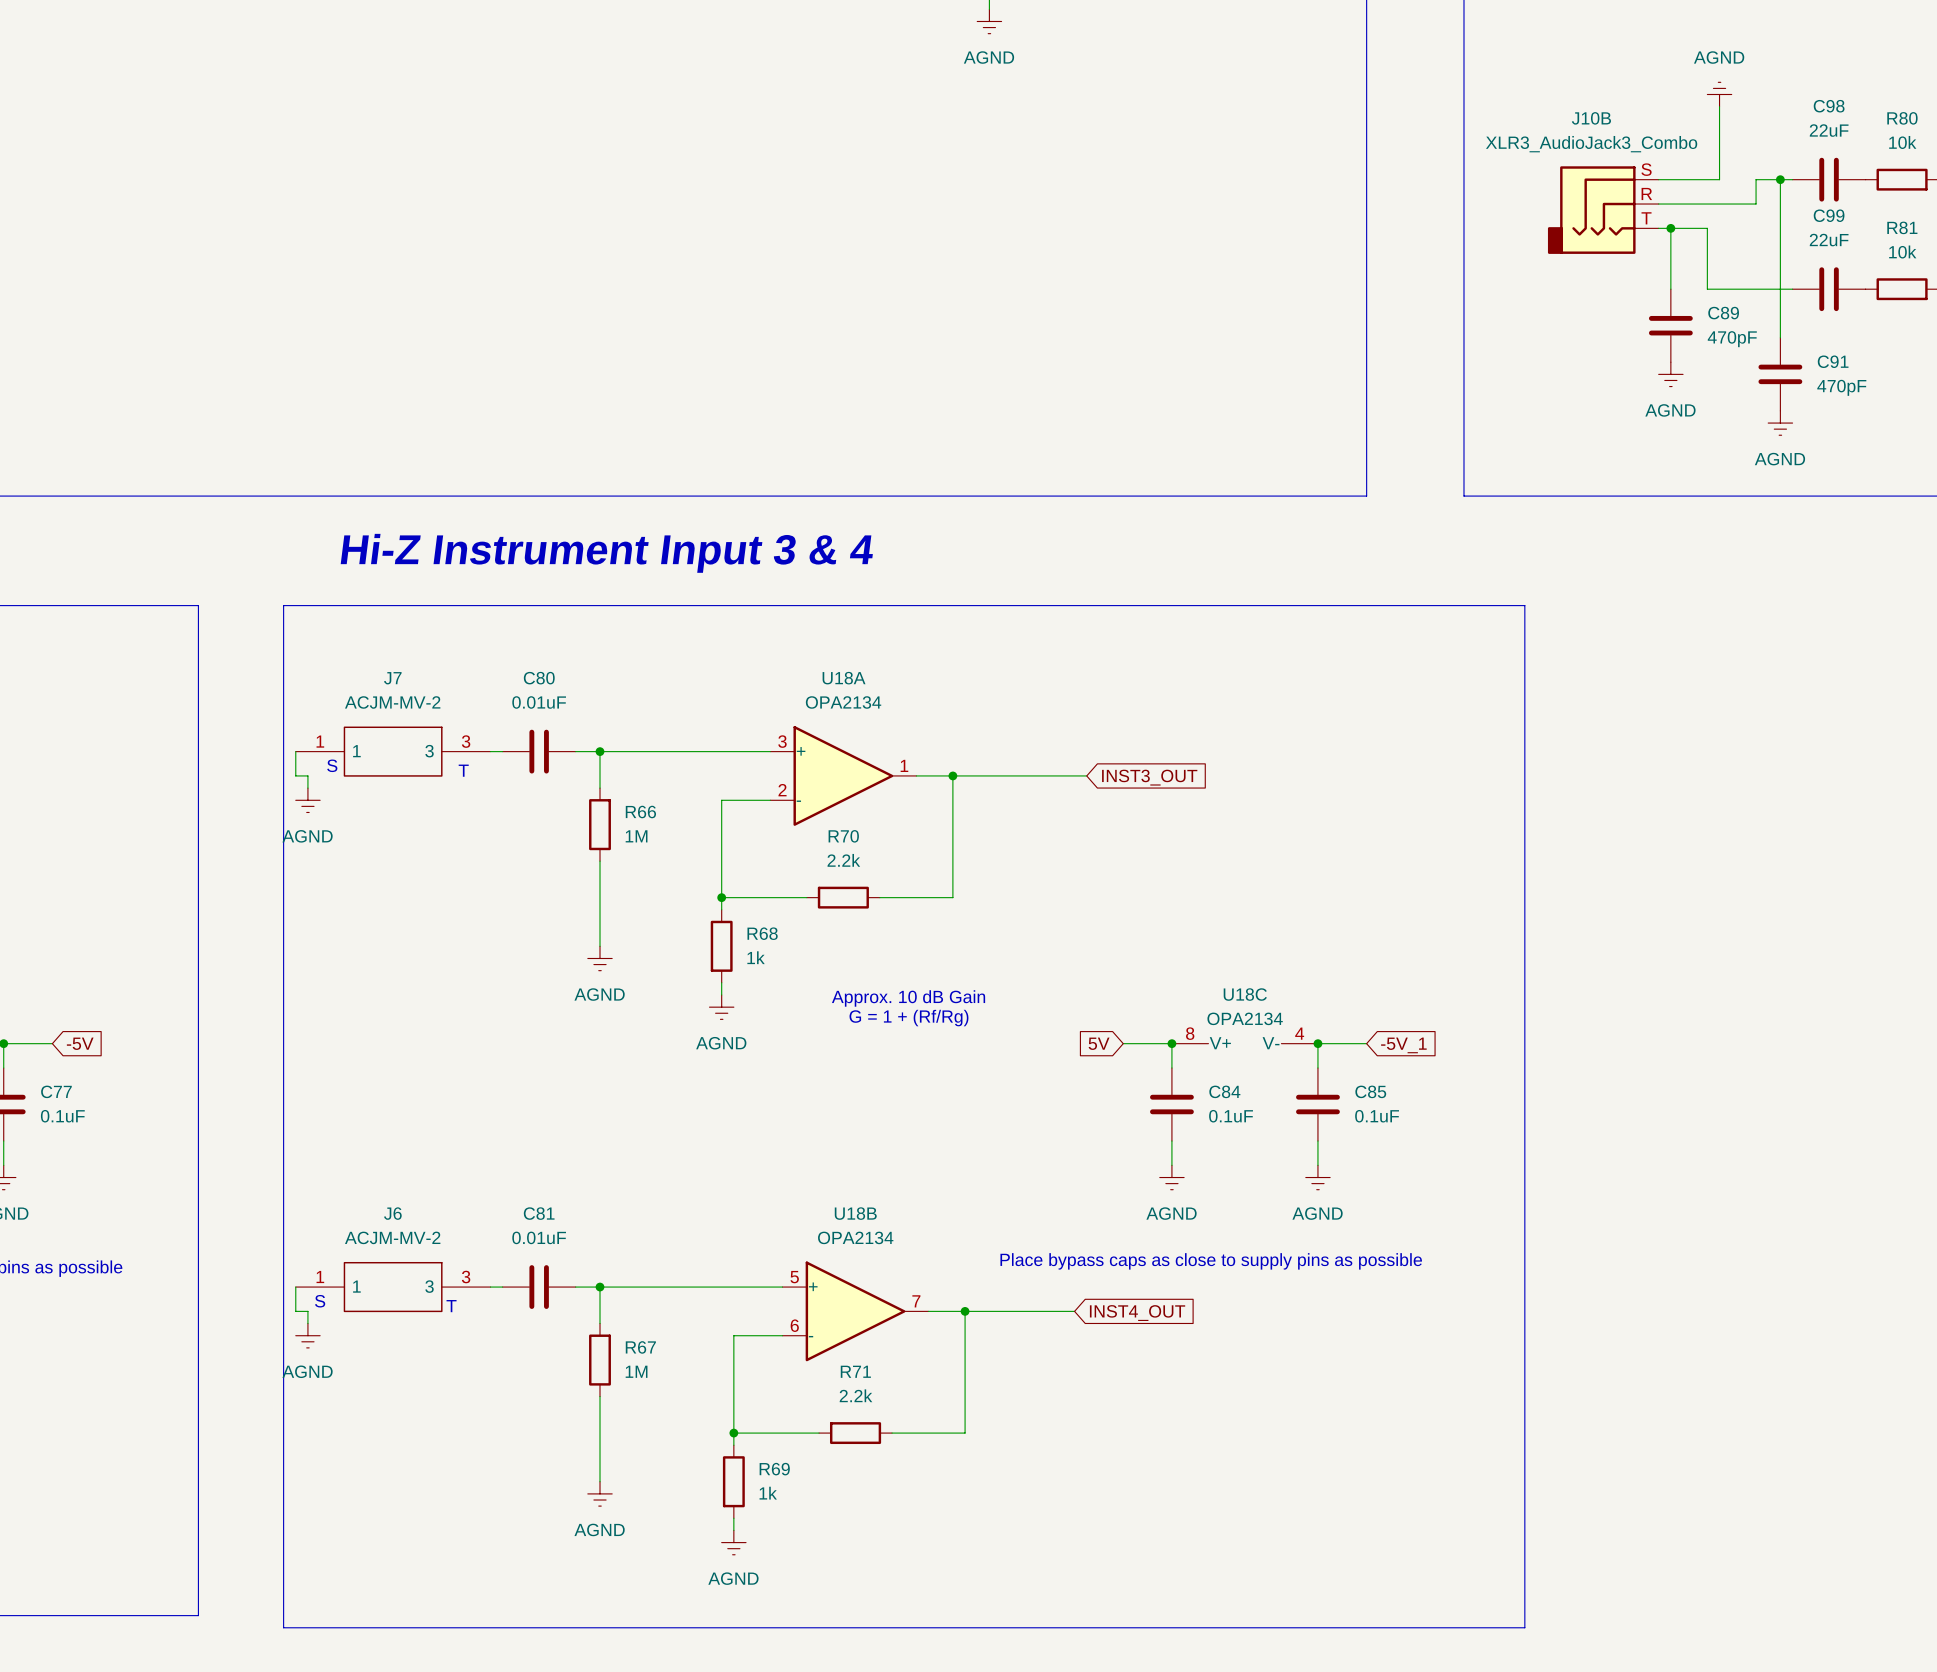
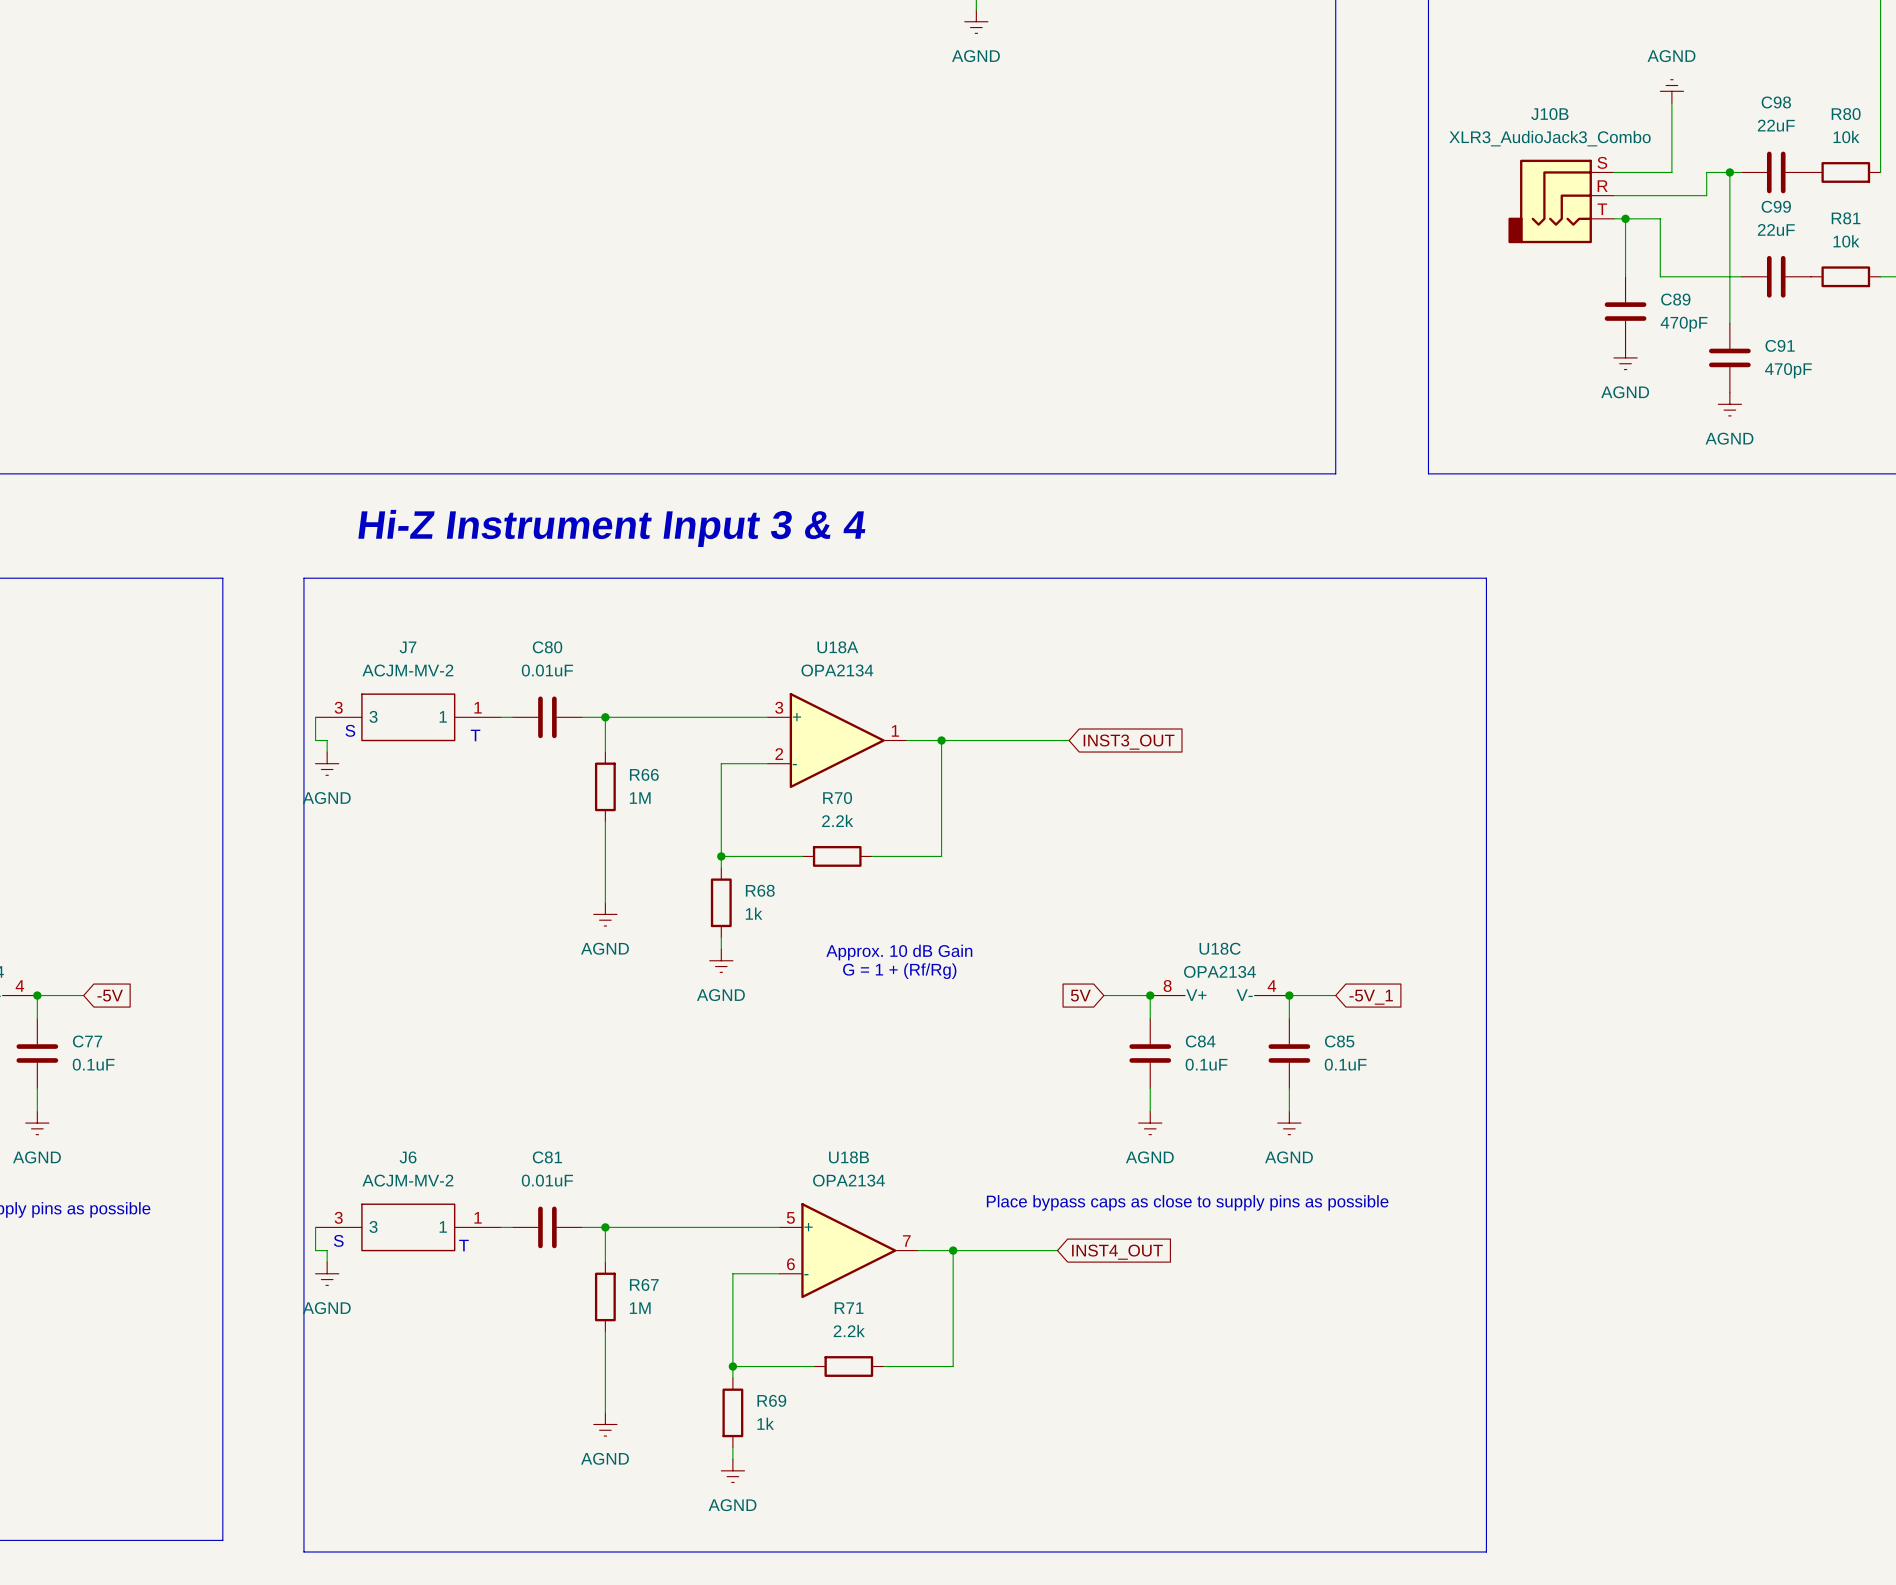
J7 rotation: 0° (393, 751) -> 180° (408, 717)
J6 rotation: 0° (393, 1287) -> 180° (408, 1227)

